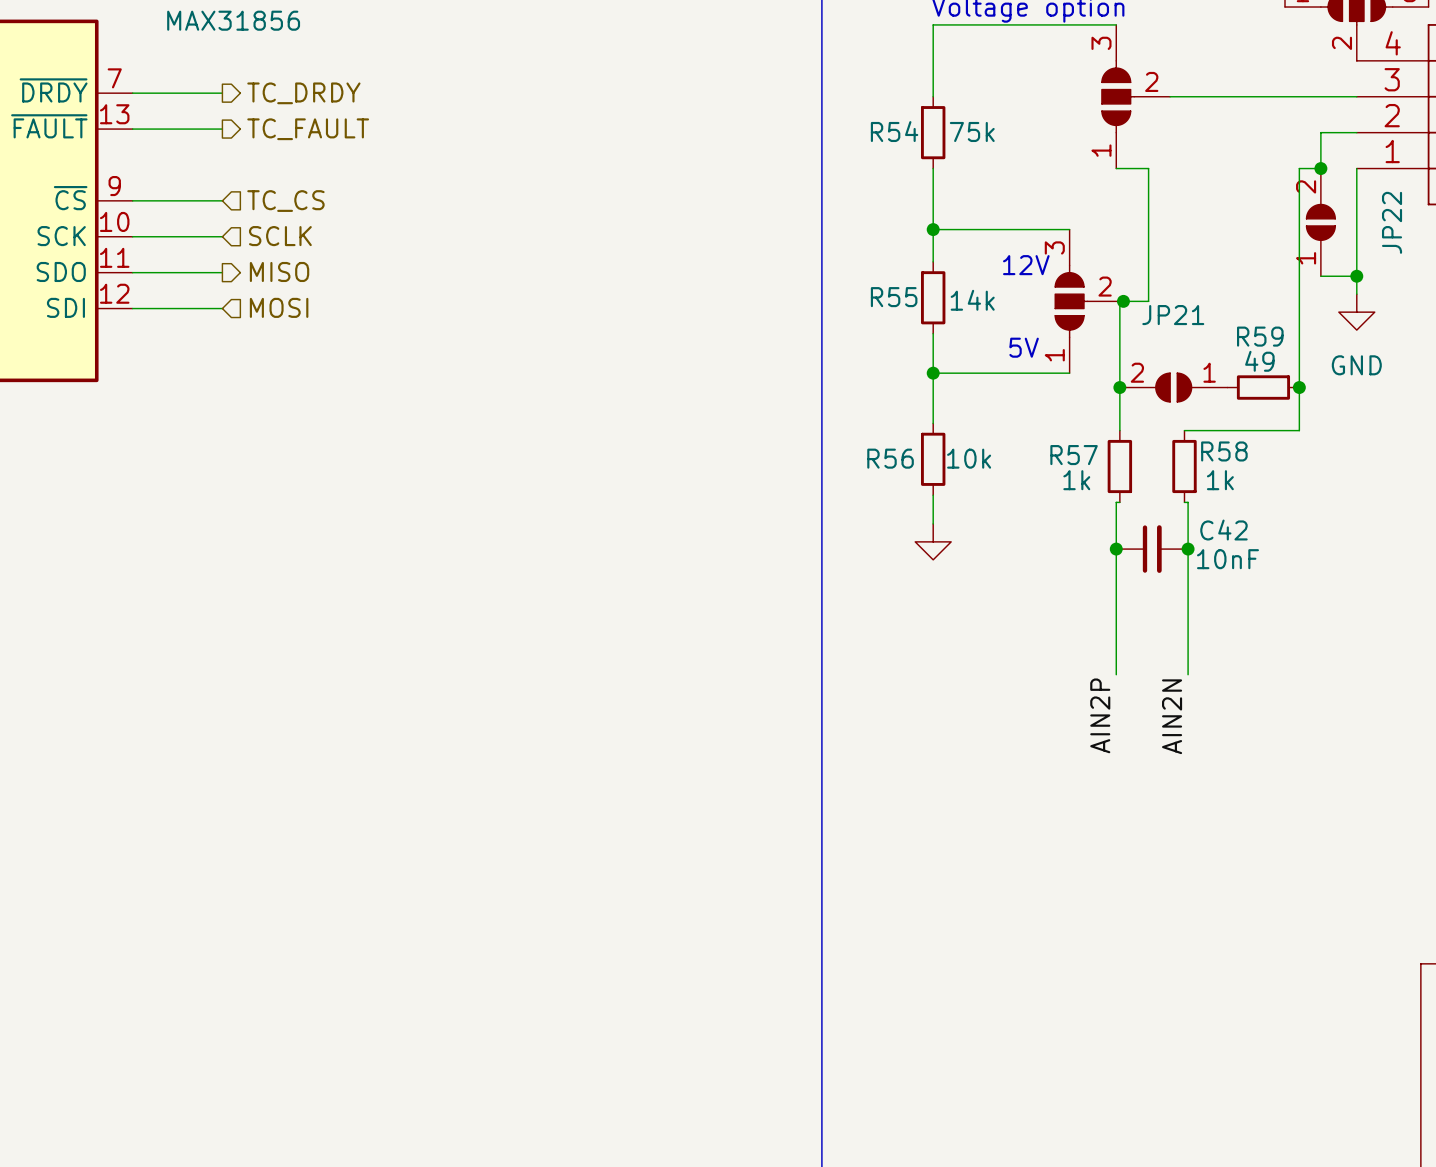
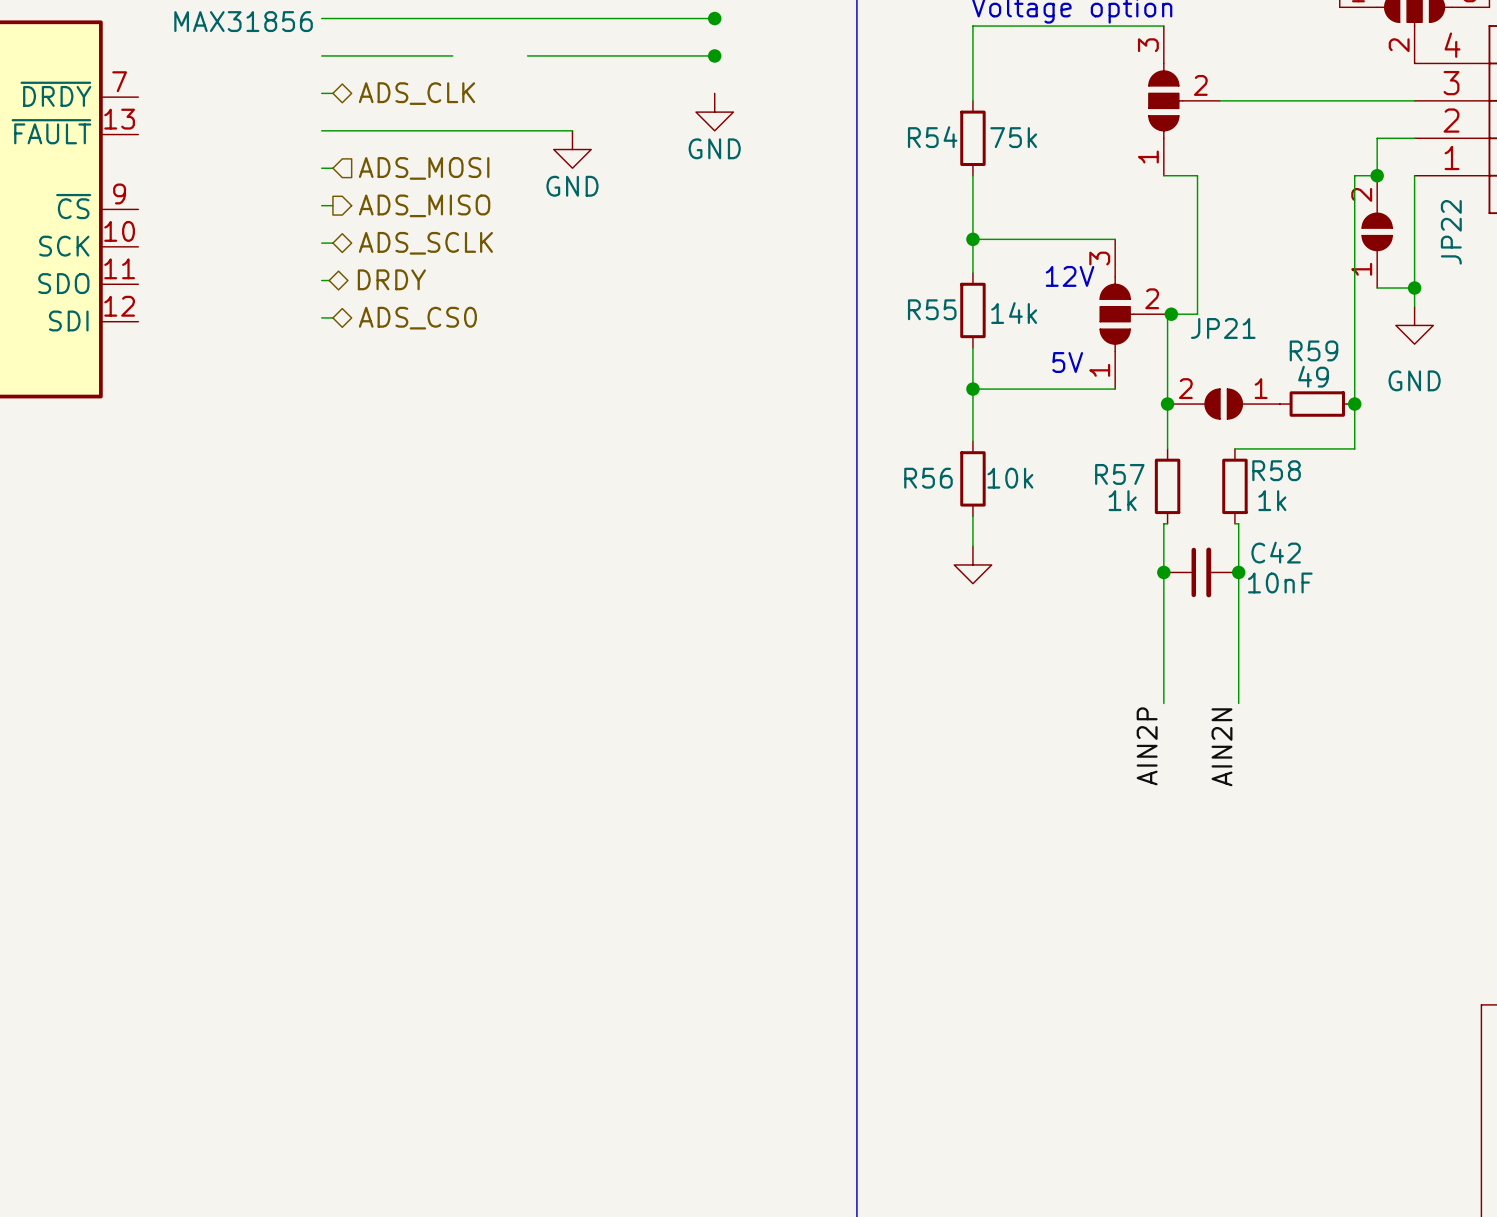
wire: none -> (321, 18) (714, 18)
junction: none -> (714, 18)
wire: none -> (321, 55) (452, 55)
wire: none -> (527, 55) (714, 55)
junction: none -> (714, 55)
wire: none -> (321, 93) (332, 93)
hierarchical label: none -> ADS_CLK (417, 93)
wire: (132, 93) (222, 93) -> none
hierarchical label: TC_DRDY (303, 93) -> none
power symbol: none -> GND (714, 112)
wire: none -> (321, 130) (572, 130)
wire: (132, 129) (222, 129) -> none
hierarchical label: TC_FAULT (308, 129) -> none
power symbol: none -> GND (572, 149)
wire: none -> (321, 168) (332, 168)
hierarchical label: none -> ADS_MOSI (424, 168)
wire: none -> (321, 205) (332, 205)
hierarchical label: none -> ADS_MISO (424, 205)
wire: (132, 200) (222, 200) -> none
hierarchical label: TC_CS (285, 201) -> none
wire: none -> (321, 243) (332, 243)
hierarchical label: none -> ADS_SCLK (425, 243)
wire: (132, 236) (222, 236) -> none
hierarchical label: SCLK (280, 236) -> none
hierarchical label: none -> DRDY (391, 279)
wire: none -> (321, 280) (329, 280)
hierarchical label: MISO (279, 271) -> none
wire: (132, 272) (222, 272) -> none
wire: none -> (321, 317) (332, 317)
hierarchical label: none -> ADS_CS0 (417, 318)
hierarchical label: MOSI (279, 307) -> none
wire: (132, 308) (222, 308) -> none

